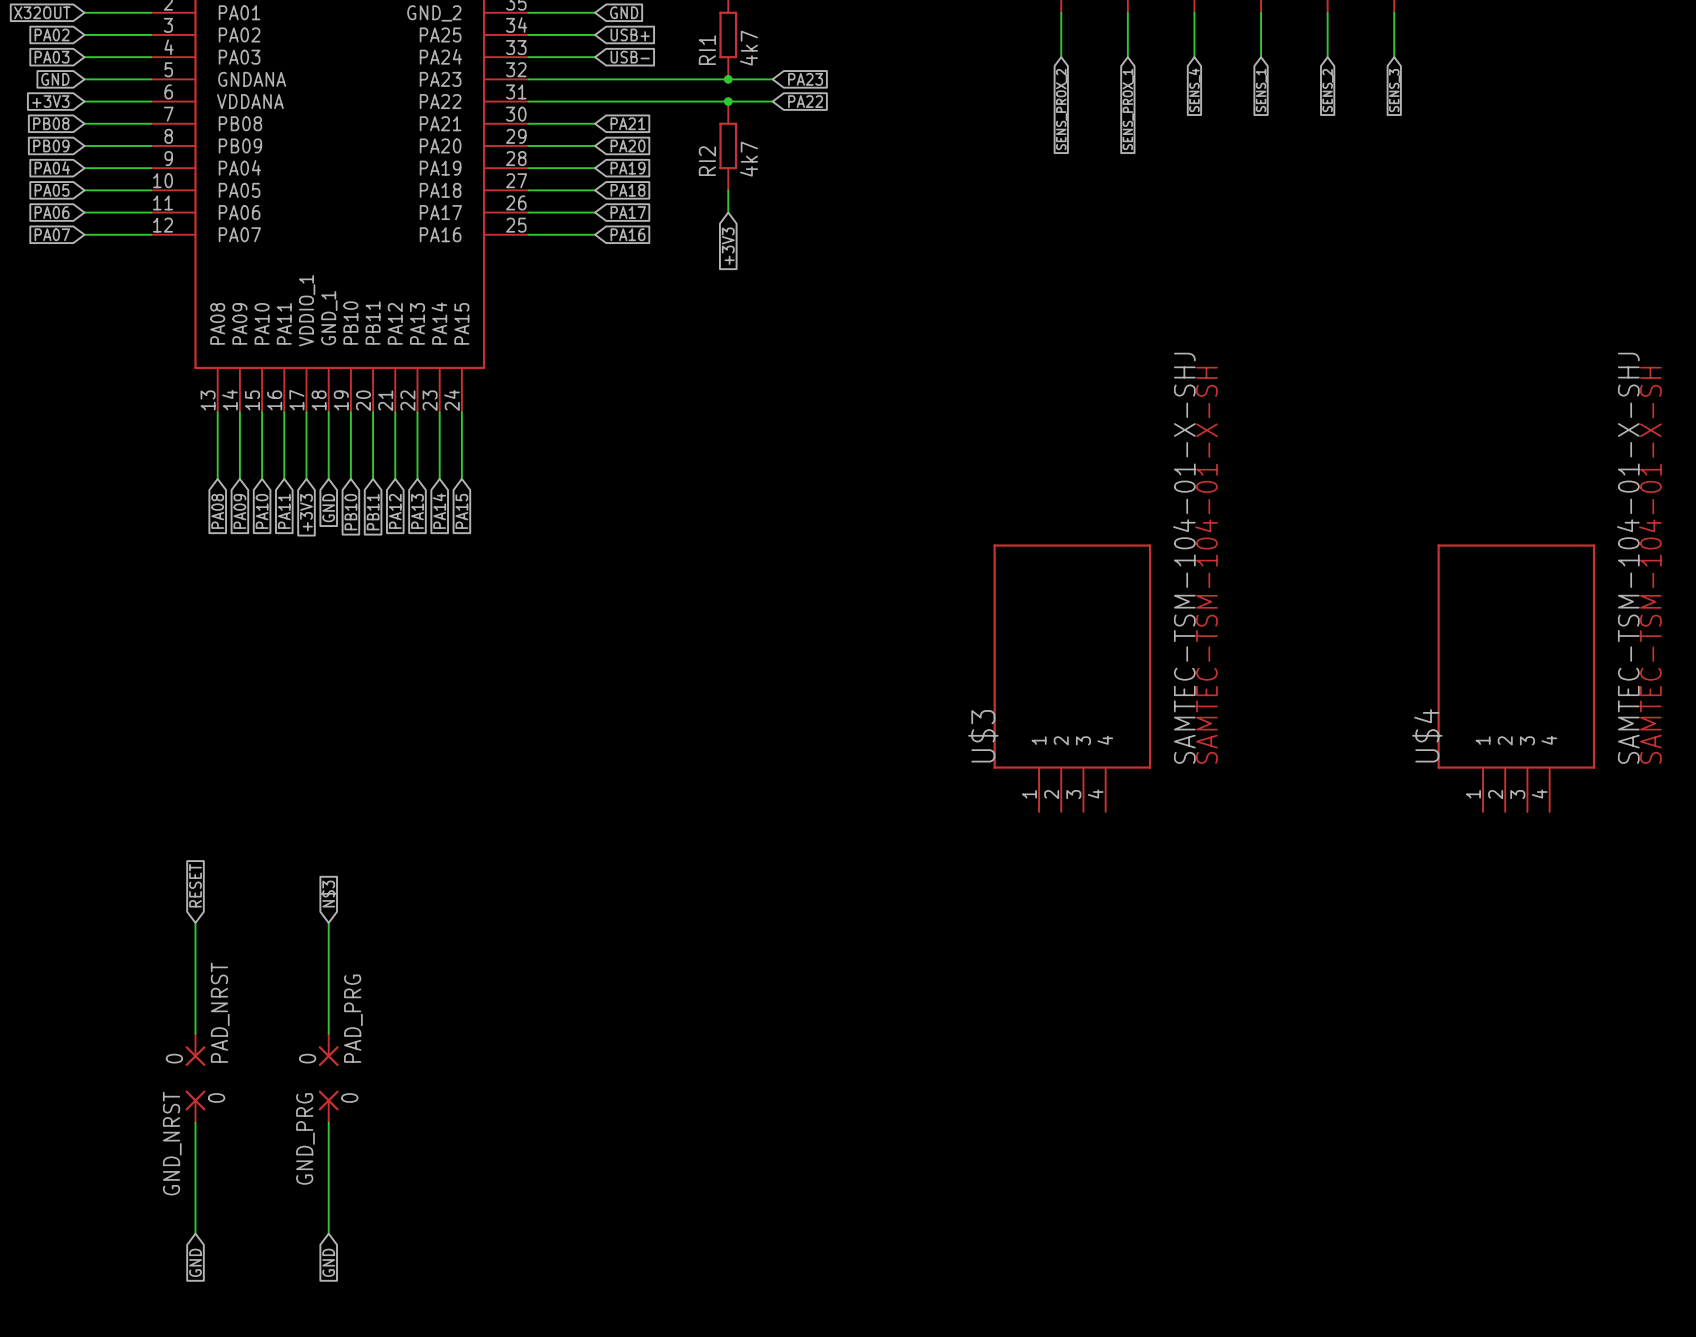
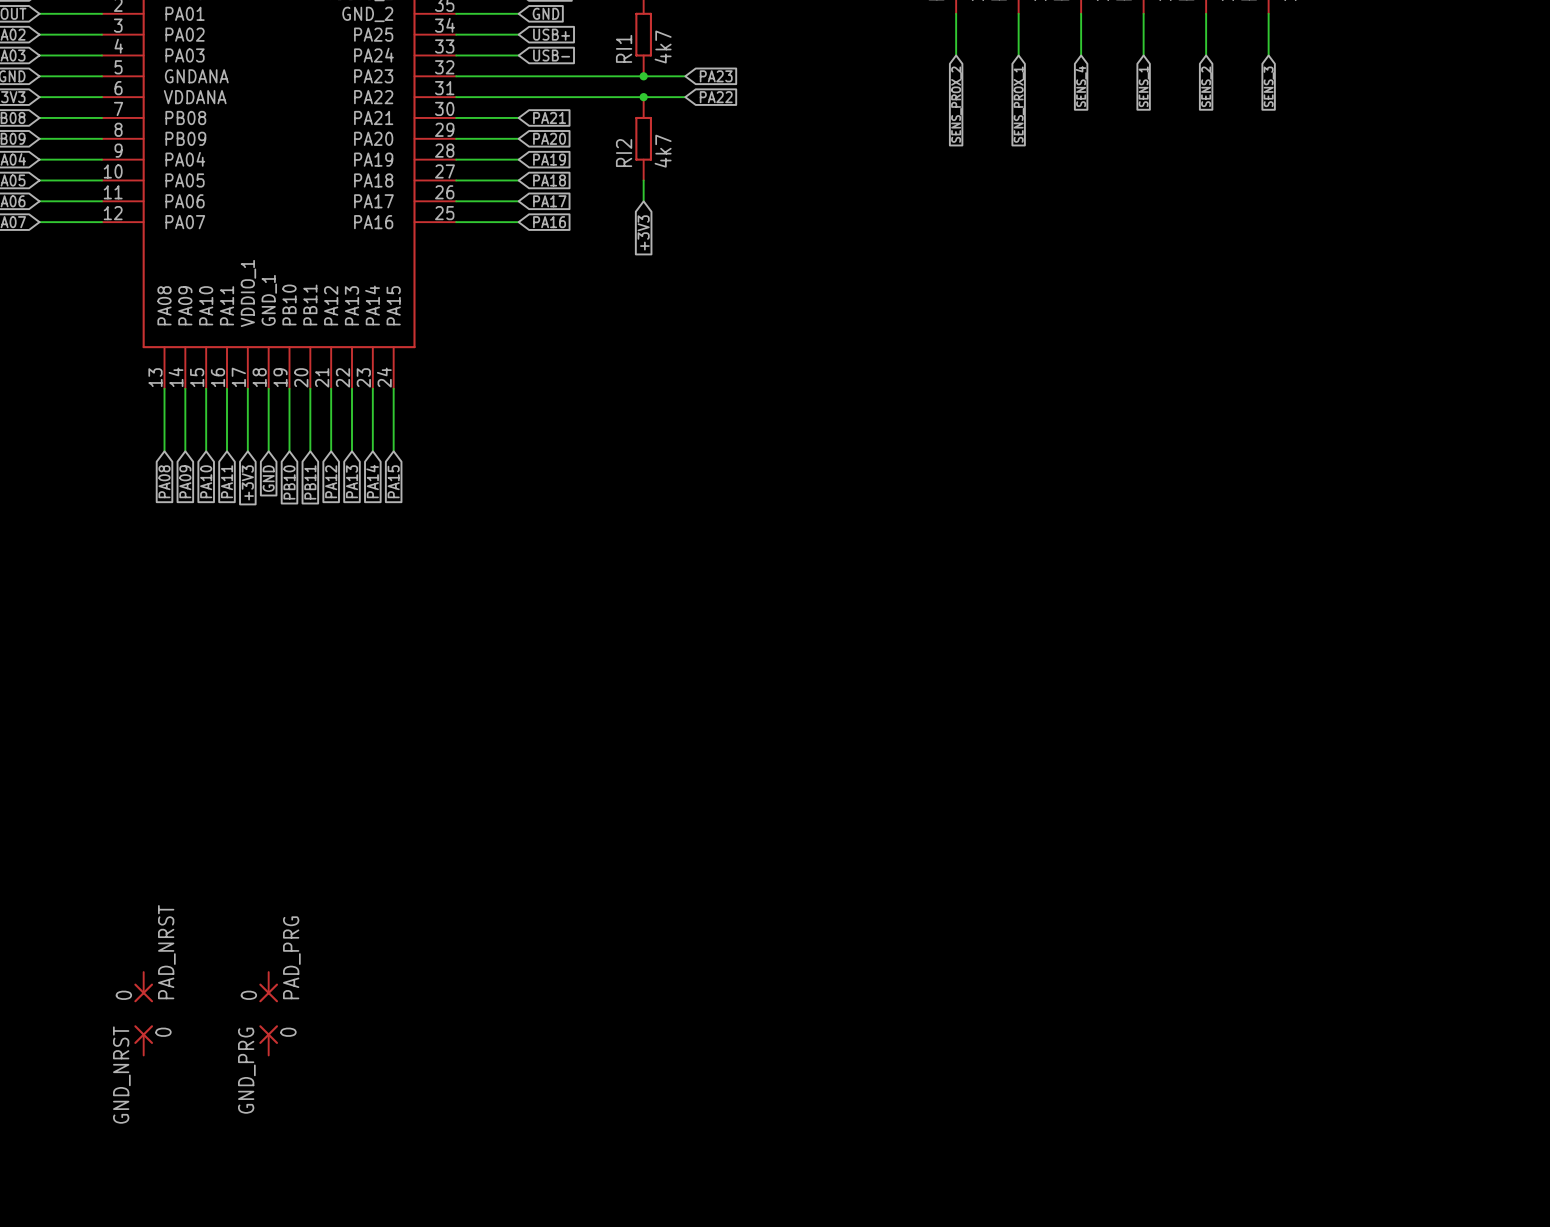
U$3: SAMTEC-TSM-104-01-X-SHJ (1072, 678) -> none
U$4: SAMTEC-TSM-104-01-X-SHJ (1516, 678) -> none
global label: RESET (195, 885) -> none
global label: N$3 (328, 894) -> none
wire: (195, 922) (195, 1033) -> none
wire: (328, 922) (328, 1033) -> none
wire: (195, 1122) (195, 1233) -> none
wire: (328, 1122) (328, 1233) -> none
global label: GND (195, 1262) -> none
global label: GND (328, 1262) -> none

